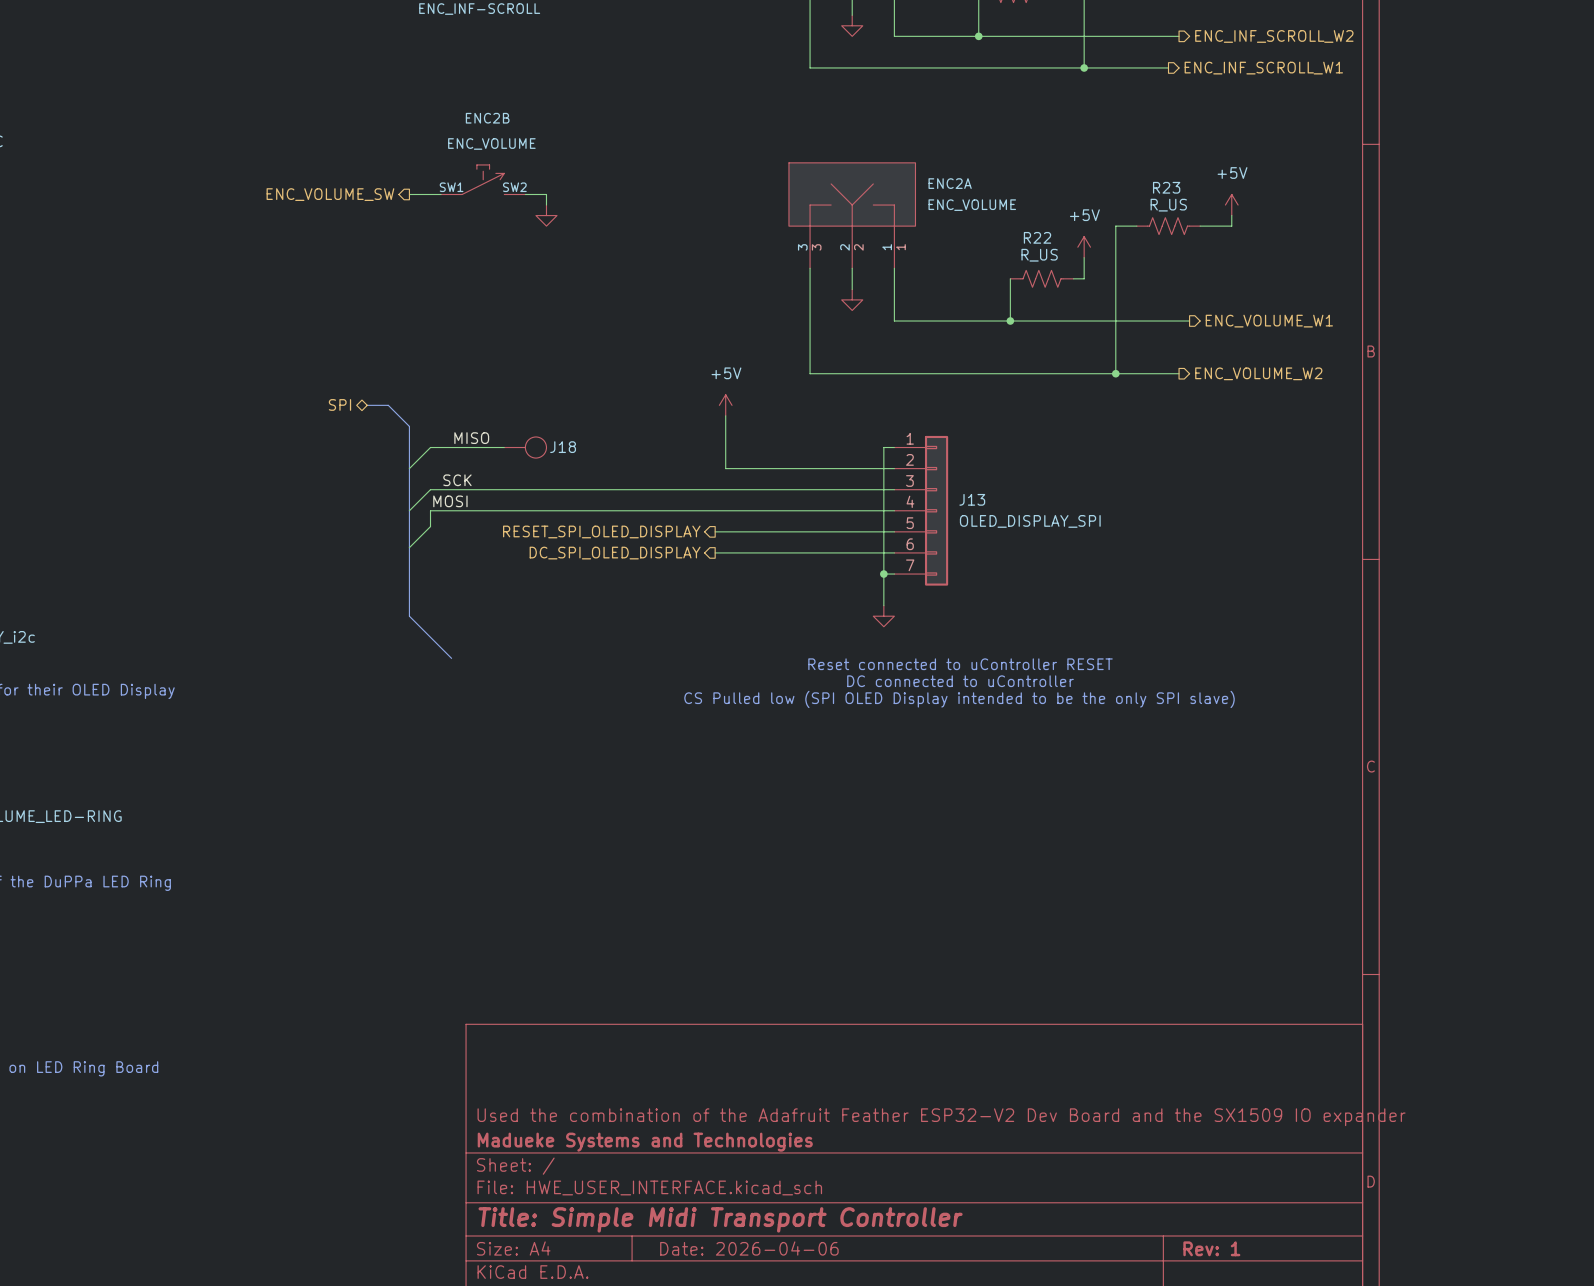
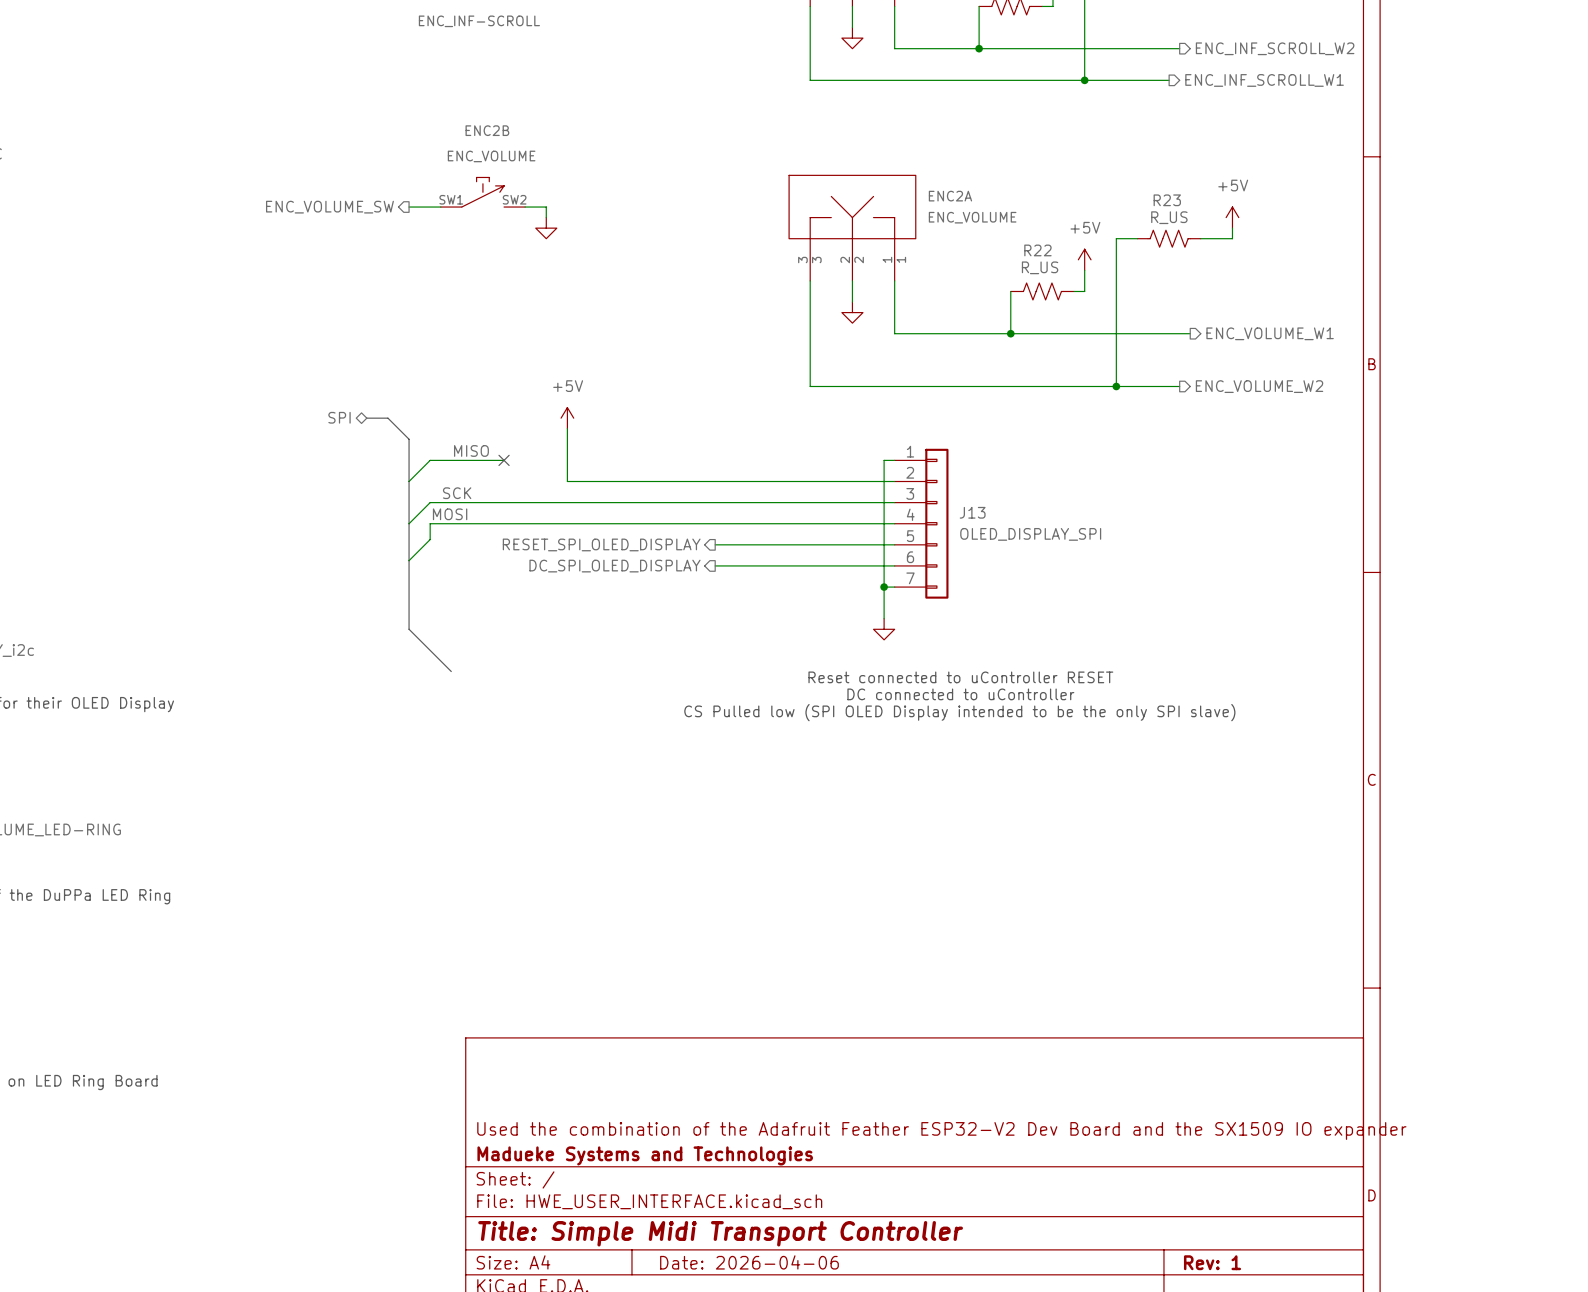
power symbol position: +5V (725, 405) -> +5V (567, 418)
wire: (725, 415) (725, 468) -> (567, 428) (567, 481) (725, 481)
no-connect mark: none -> (504, 460)
J18: (525, 447) -> none

